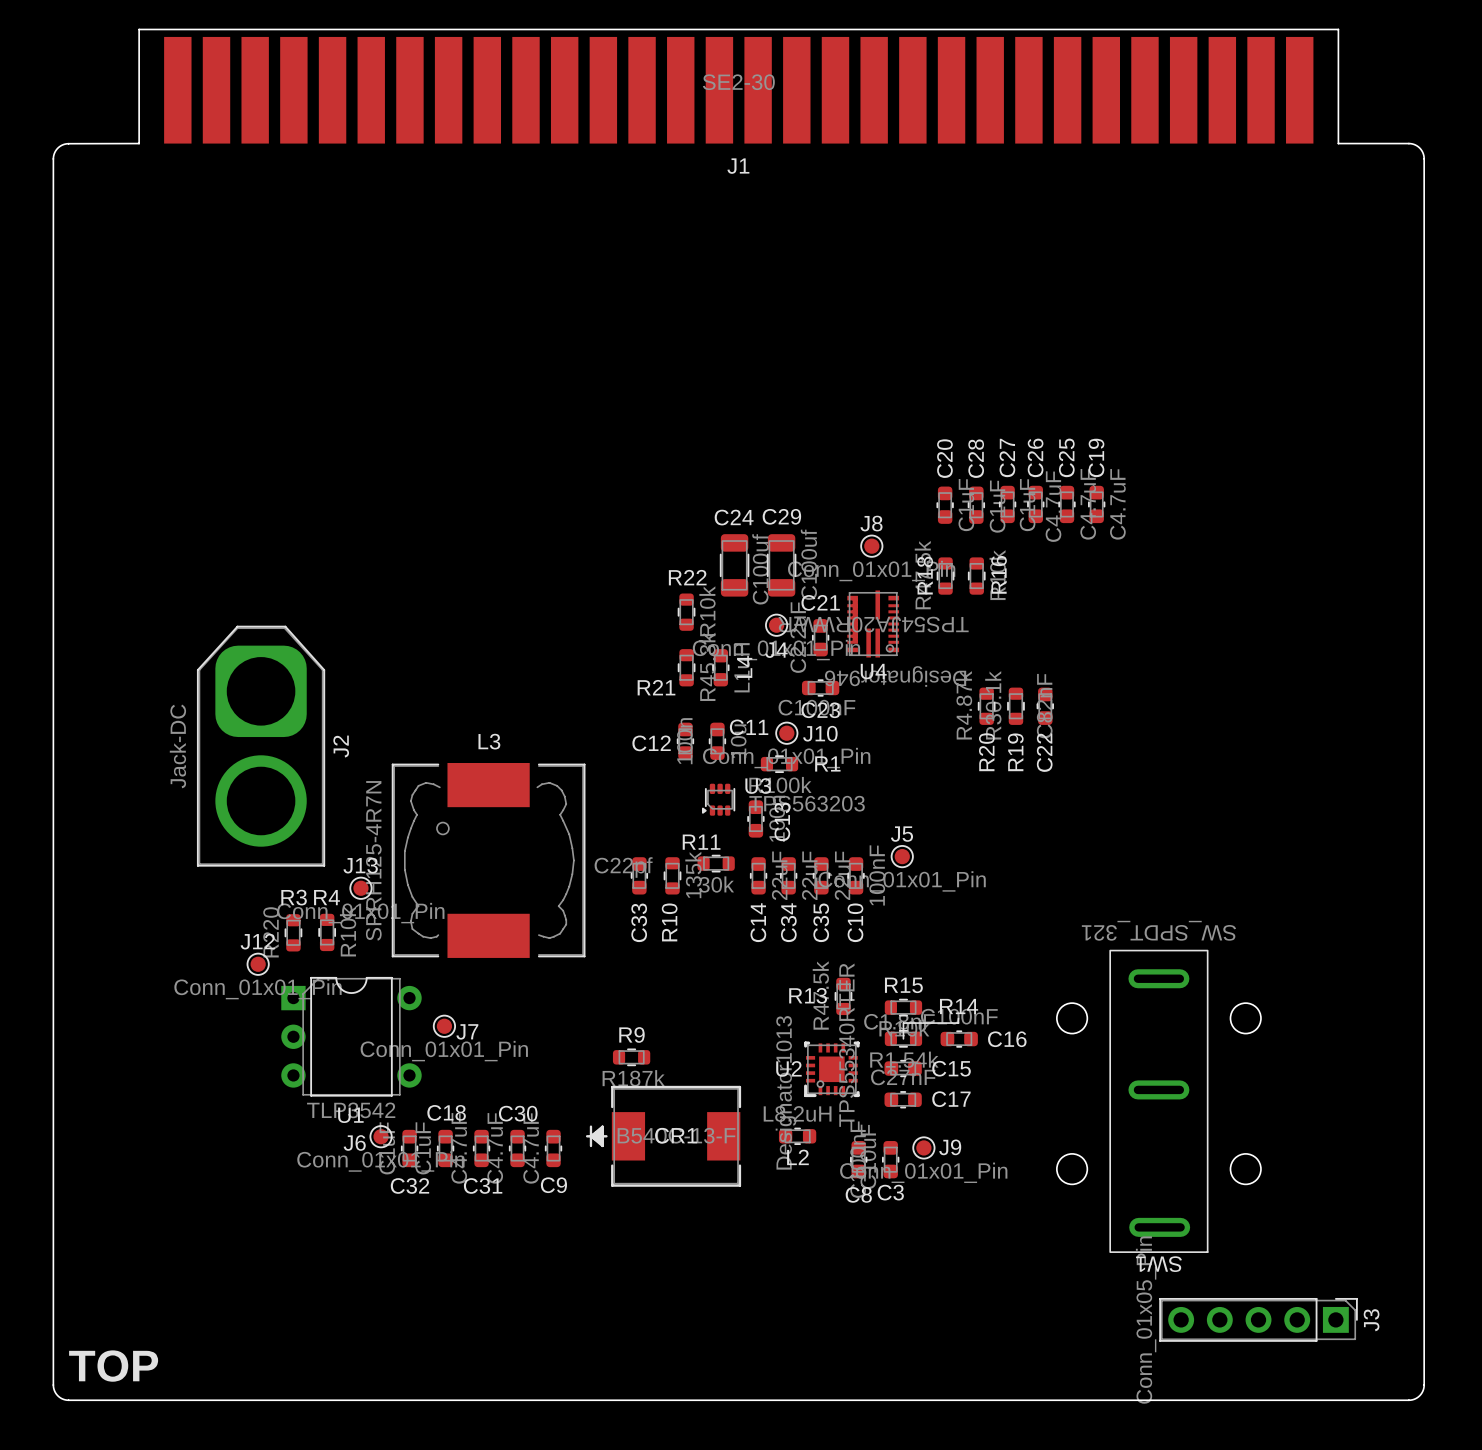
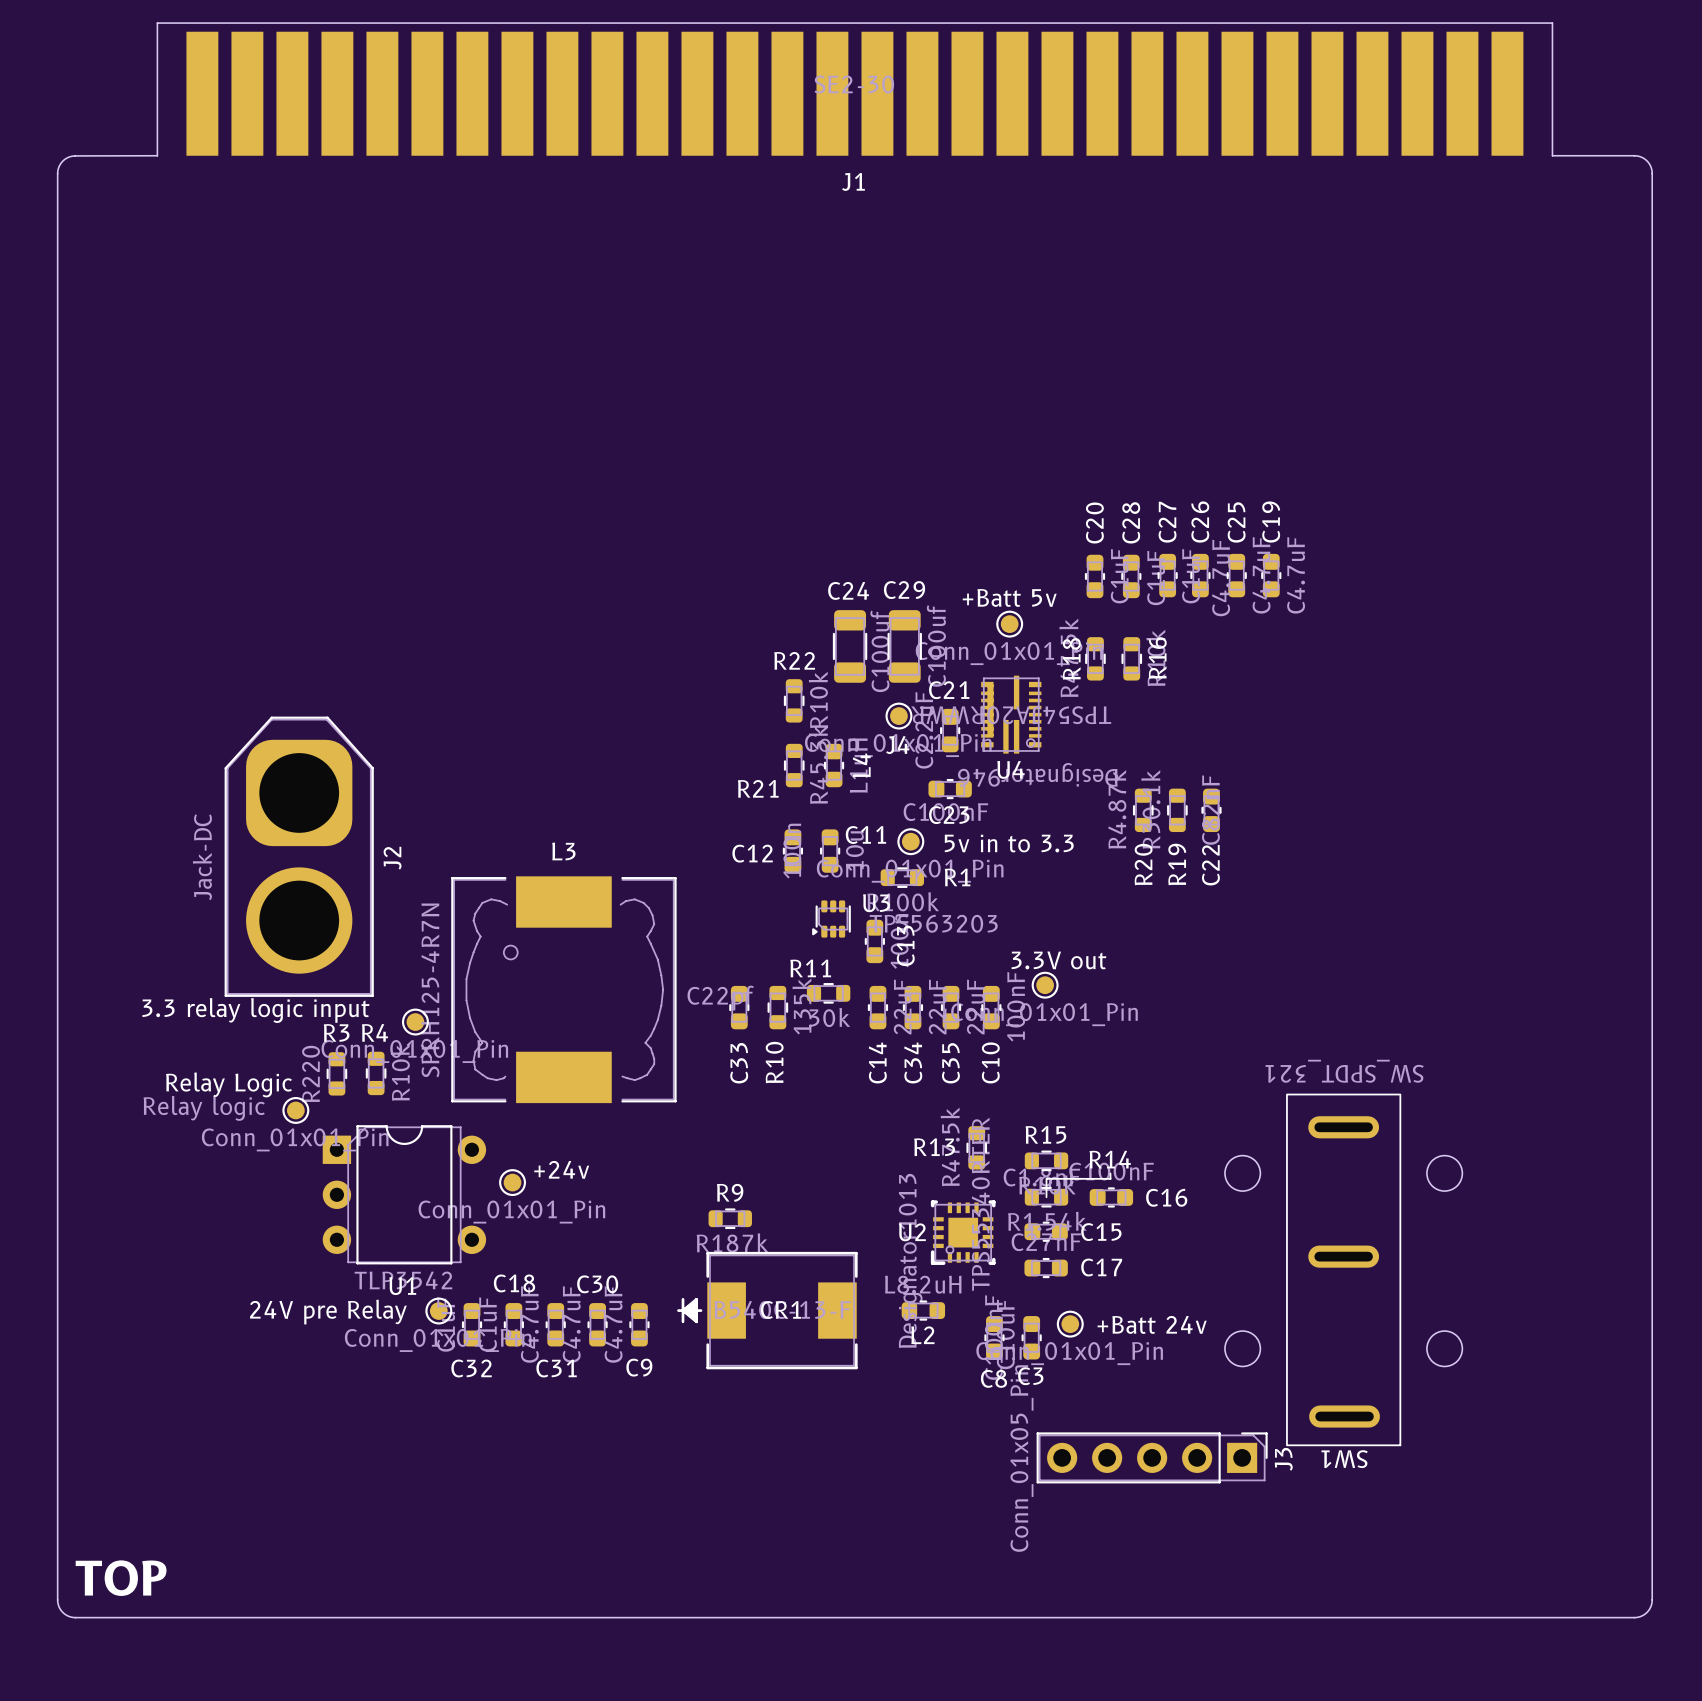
J8 name: J8 (871, 523) -> +Batt 5v (1009, 597)
J10 name: J10 (820, 733) -> 5v in to 3.3 (1009, 843)
J5 name: J5 (901, 834) -> 3.3V out (1058, 960)
J13 name: J13 (360, 865) -> 3.3 relay logic input (255, 1010)
J12 name: J12 (257, 941) -> Relay Logic (228, 1084)
J12 text: none -> Relay logic (204, 1108)
J7 name: J7 (467, 1031) -> +24v (561, 1169)
J6 name: J6 (354, 1142) -> 24V pre Relay (328, 1312)
J9 name: J9 (950, 1147) -> +Batt 24v (1152, 1324)
J3 position: (1258, 1319) -> (1152, 1457)

